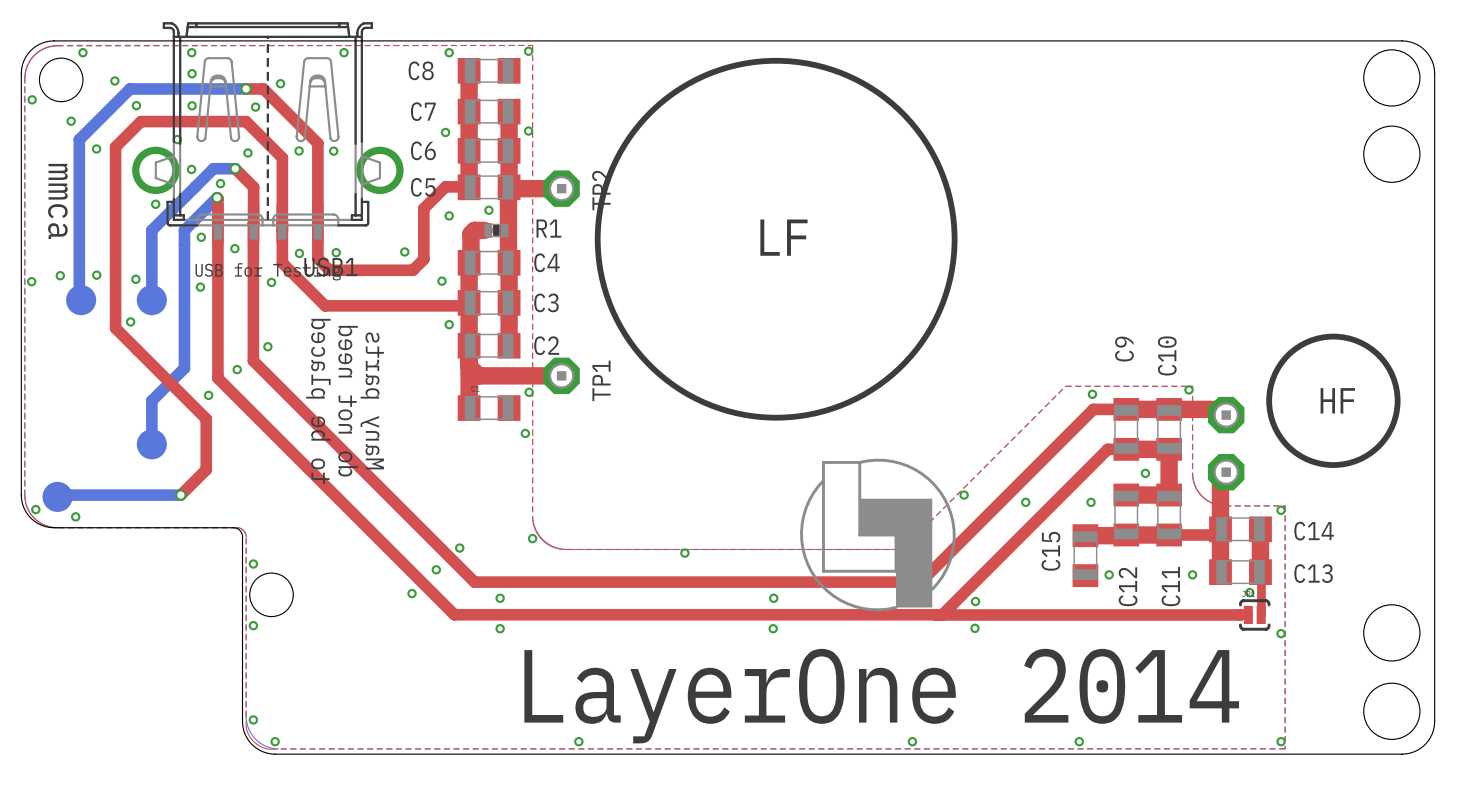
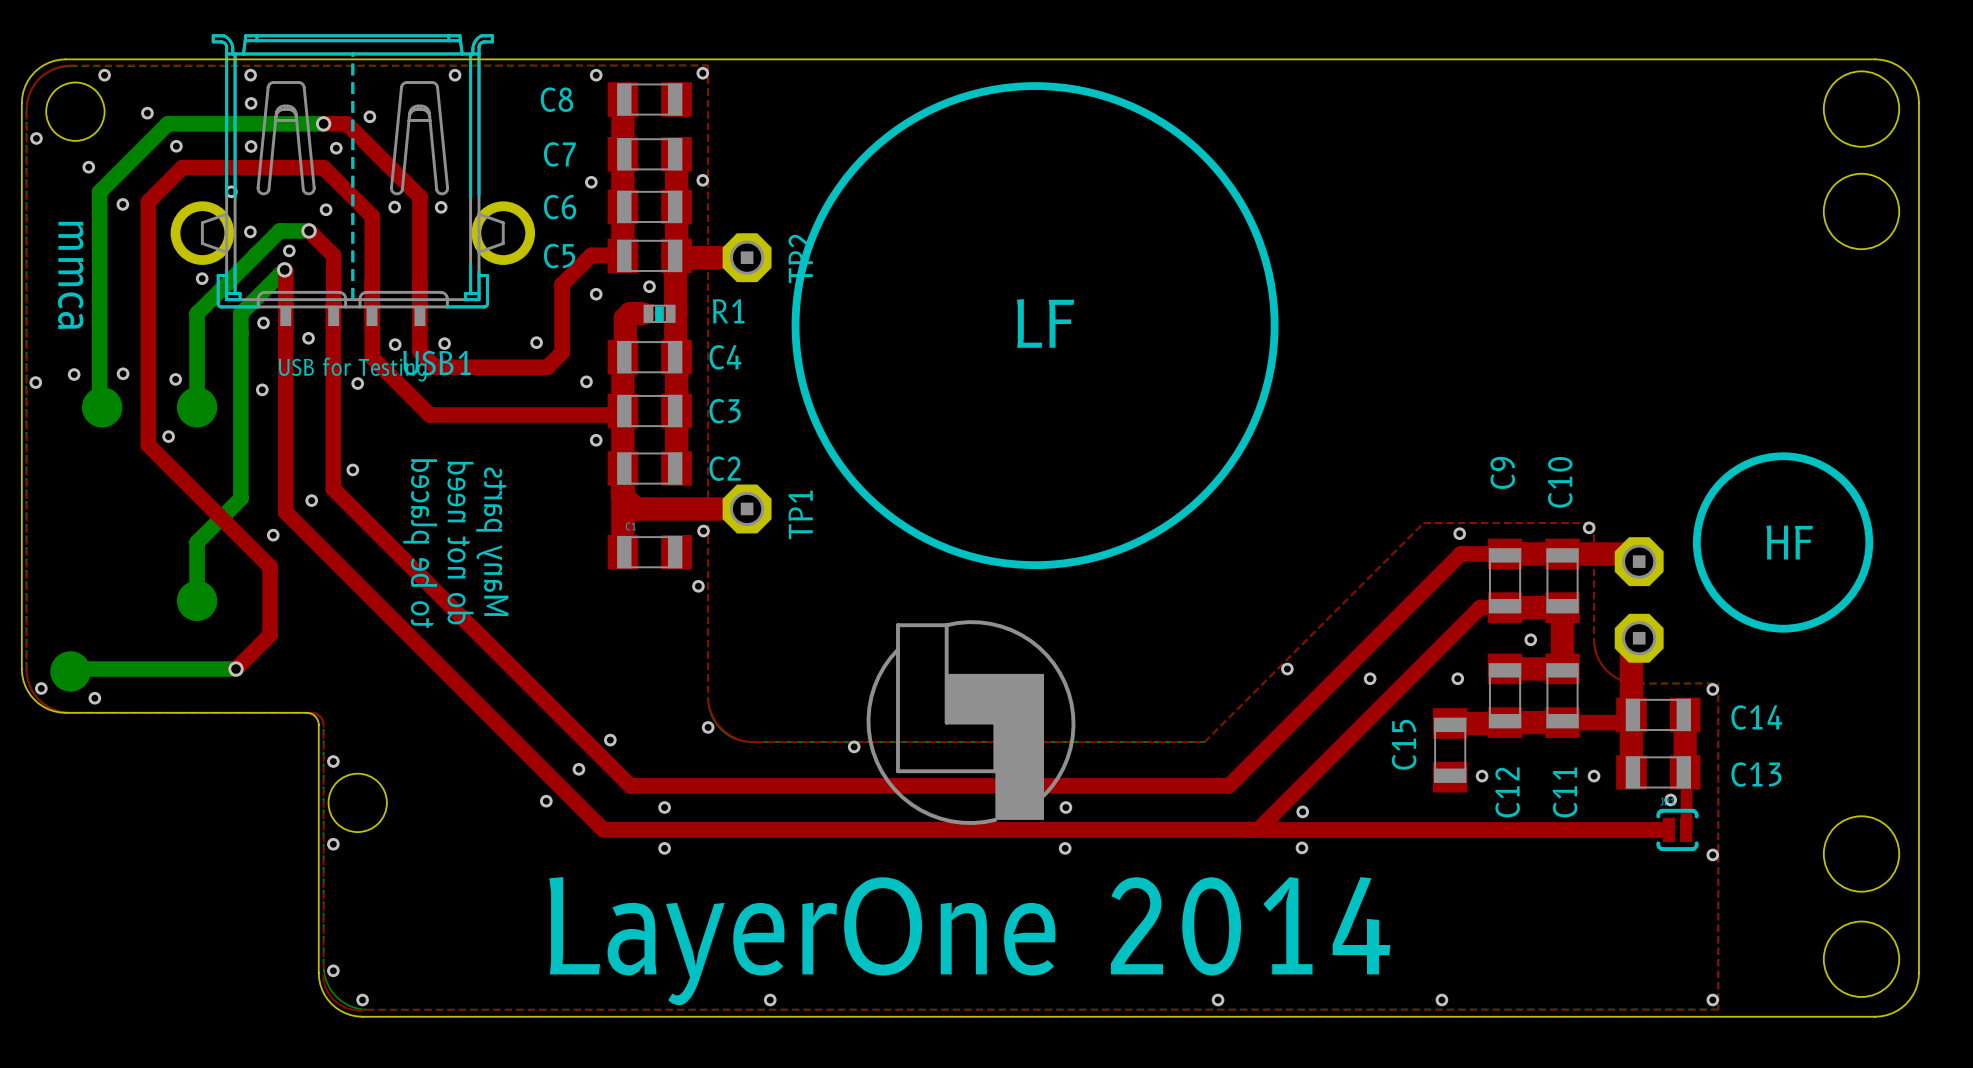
drawing position: (877, 534) -> (971, 722)
via position: (684, 553) -> (854, 746)
via: (773, 598) -> none
via: none -> (1065, 807)
via: (773, 628) -> none
via: none -> (1065, 848)
text position: LayerOne 2014 (881, 696) -> LayerOne 2014 (969, 941)

